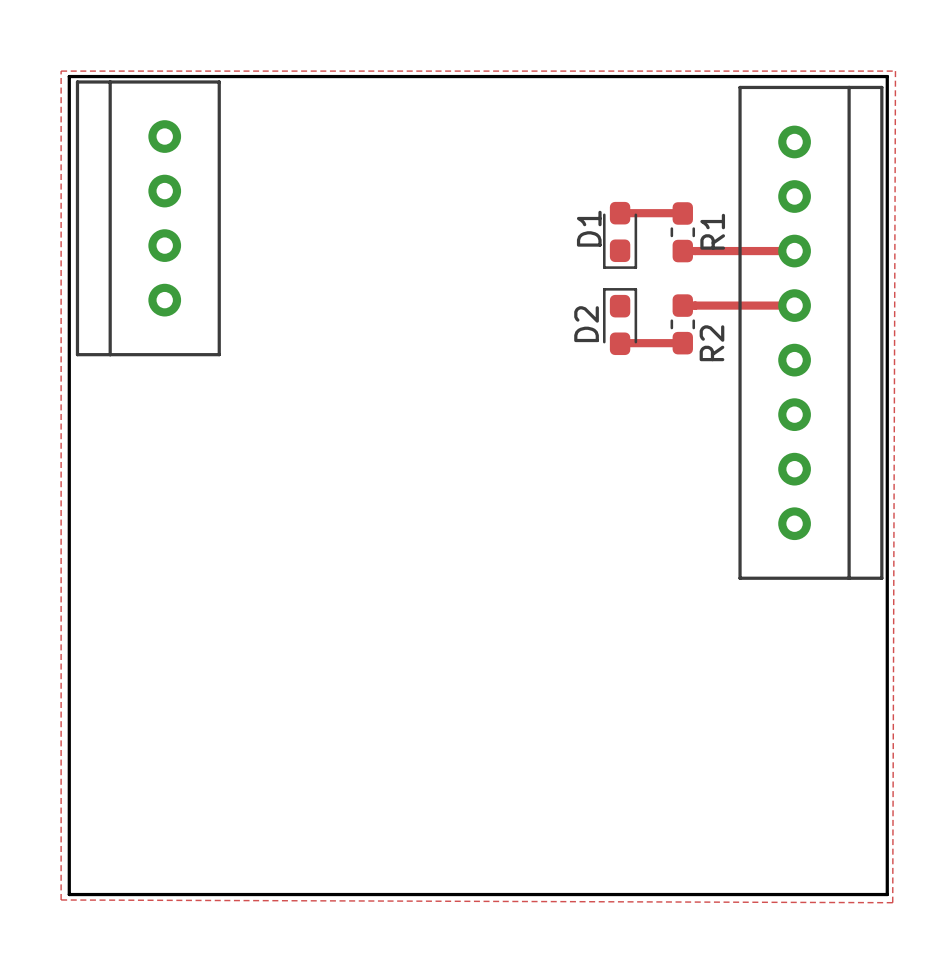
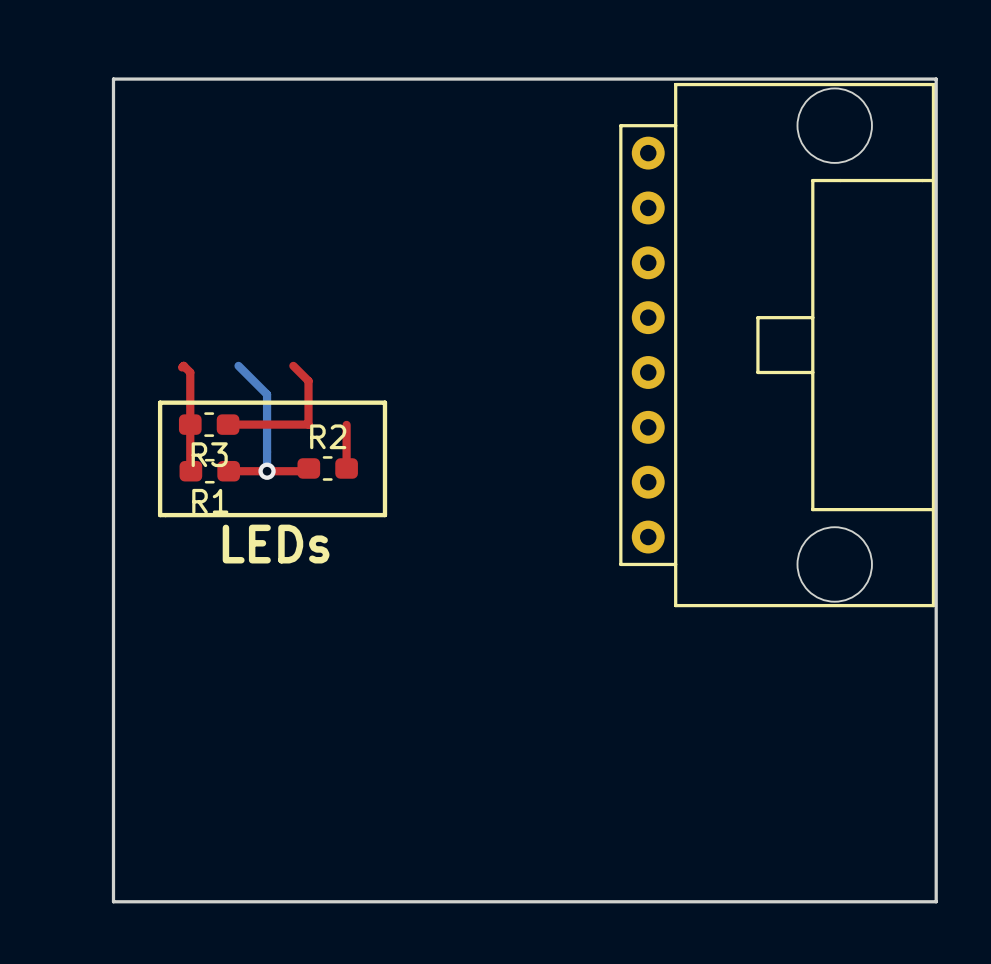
top zone outline: (61, 71) (895, 71) (892, 902) (61, 899) (61, 71) -> none
top track: (620, 213) (682, 213) -> none
part: (148, 218) -> none
R1 rotation: 0° (682, 232) -> 90° clockwise (209, 471)
R1 position: (682, 232) -> (209, 471)
D1: (620, 235) -> none
top track: (682, 251) (794, 251) -> none
top track: (682, 305) (794, 305) -> none
D2: (620, 321) -> none
R2 rotation: 0° (682, 324) -> 90° clockwise (327, 468)
R2 position: (682, 324) -> (327, 468)
part: (810, 332) -> none
part: none -> (777, 345)
top track: (682, 343) (620, 343) -> none
R2 name position: R2 (711, 343) -> R2 (328, 436)
bottom track: none -> (238, 365) (267, 394) (267, 471)
top track: none -> (293, 365) (308, 381) (308, 424) (228, 424)
top track: none -> (182, 367) (183, 365) (190, 372) (190, 471)
line: none -> (160, 402) (160, 515) (384, 515) (384, 402) (160, 402)
R3: none -> (209, 424)
top track: none -> (346, 424) (346, 468)
top track: none -> (308, 468) (306, 471) (228, 471)
via: none -> (267, 471)
text: none -> LEDs (276, 544)

